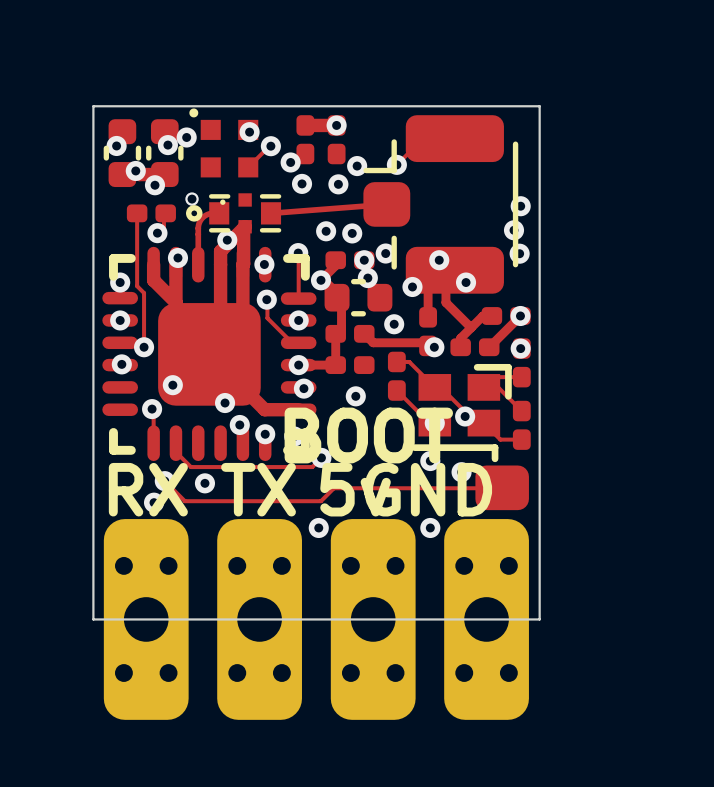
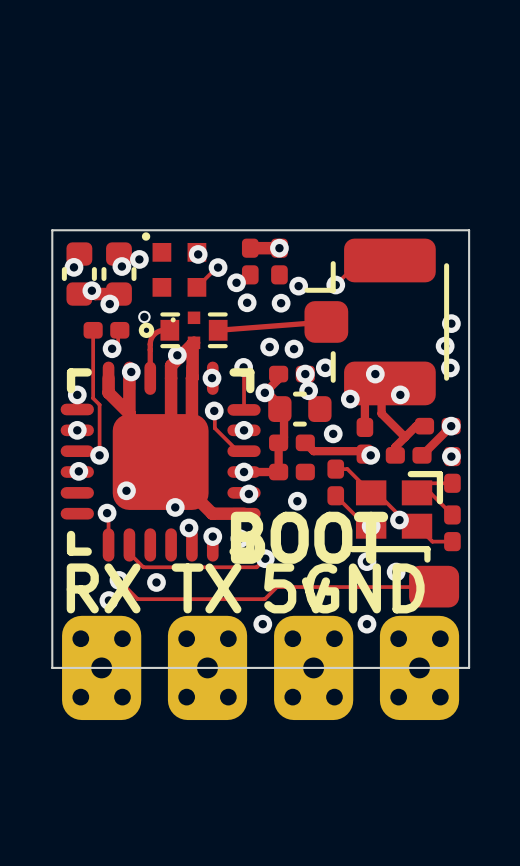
part footprint: [103, 519, 189, 720] -> [62, 615, 142, 721]
part footprint: [217, 519, 302, 720] -> [167, 615, 248, 721]
part footprint: [330, 519, 416, 720] -> [274, 615, 354, 721]
part footprint: [444, 519, 529, 720] -> [379, 615, 460, 721]
board edge: (93, 574) (93, 619) (539, 619) (539, 574) -> (52, 667) (469, 667)

